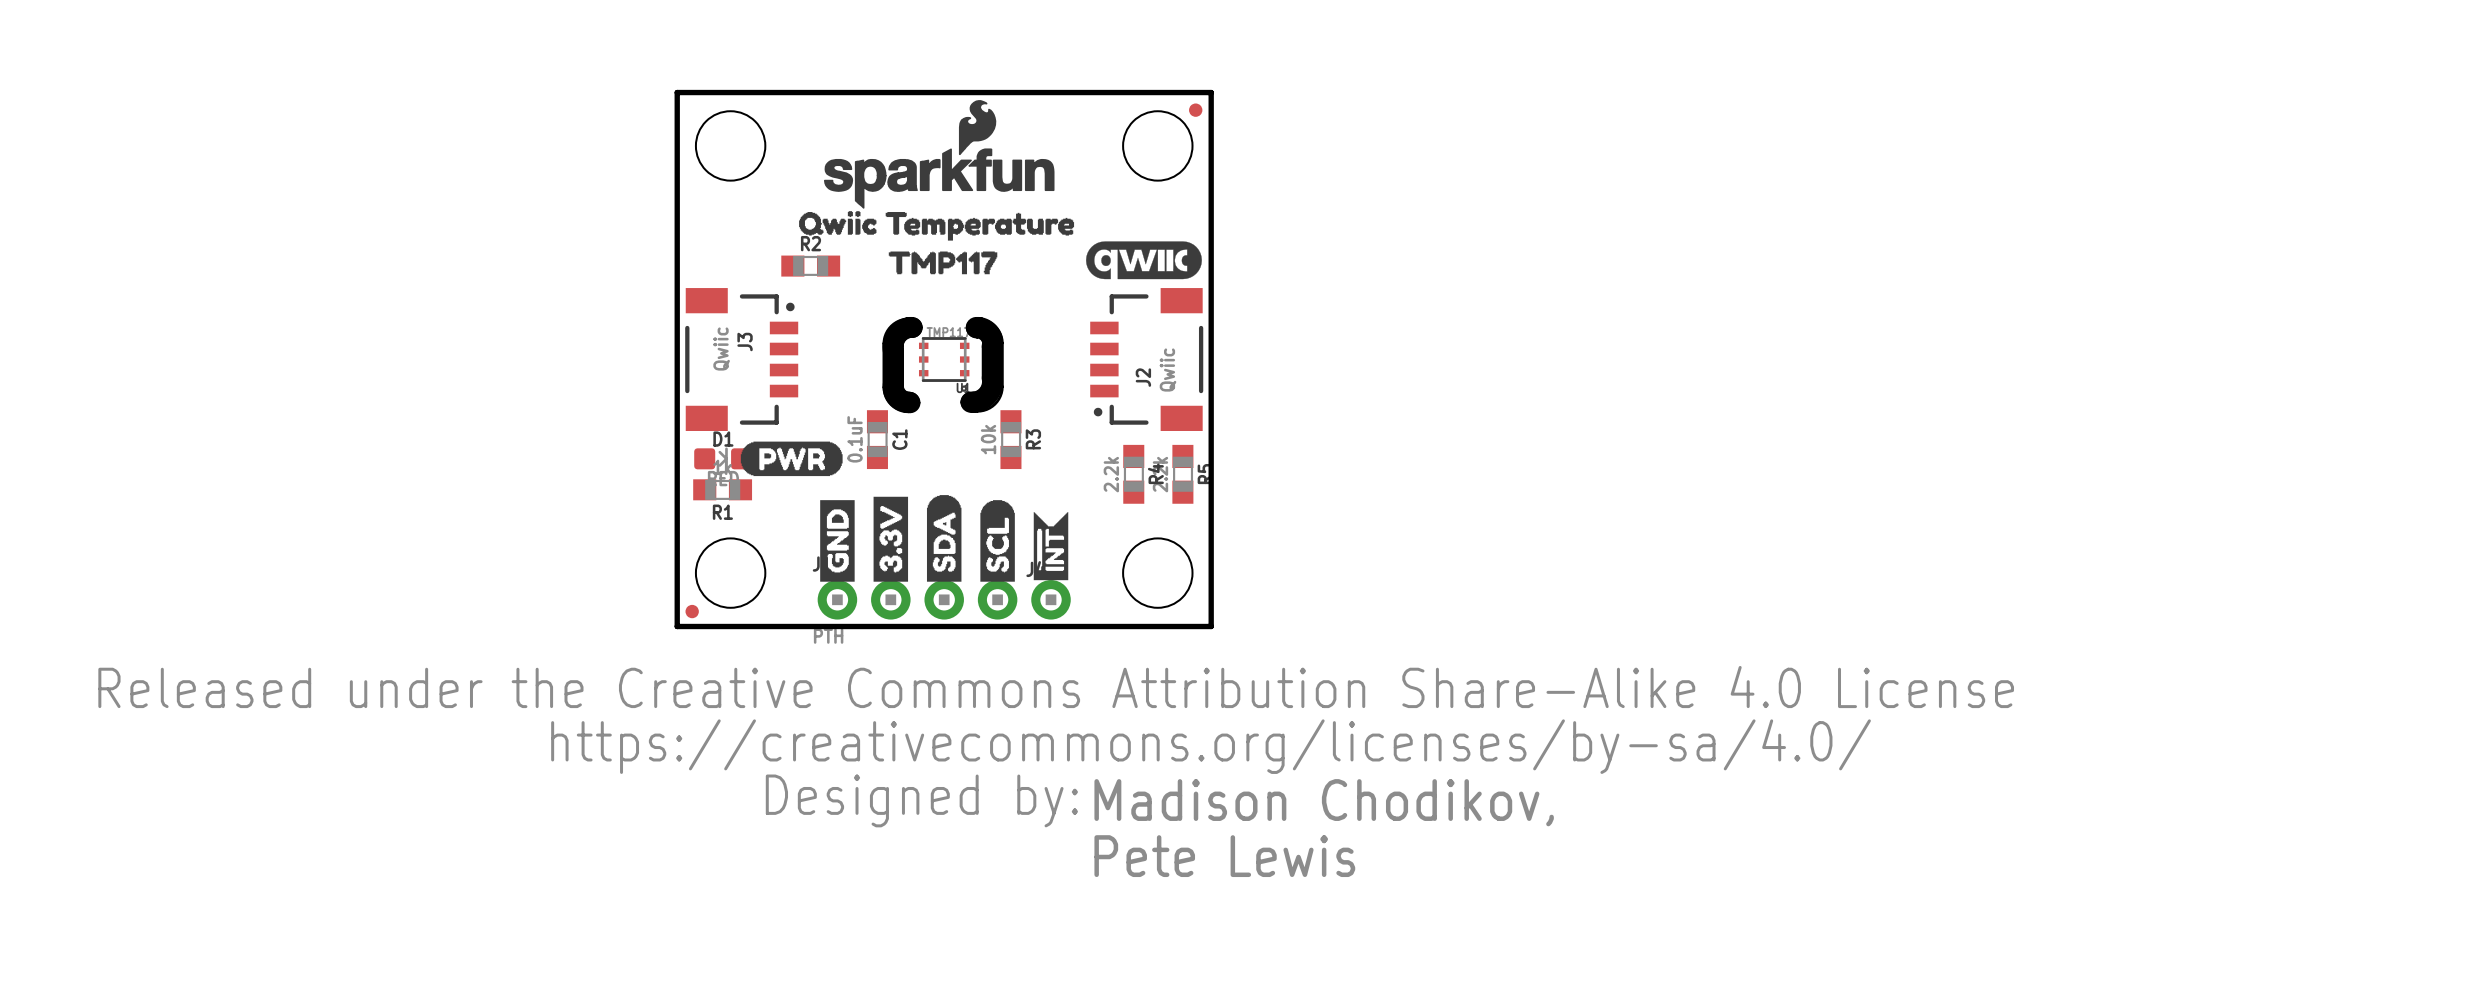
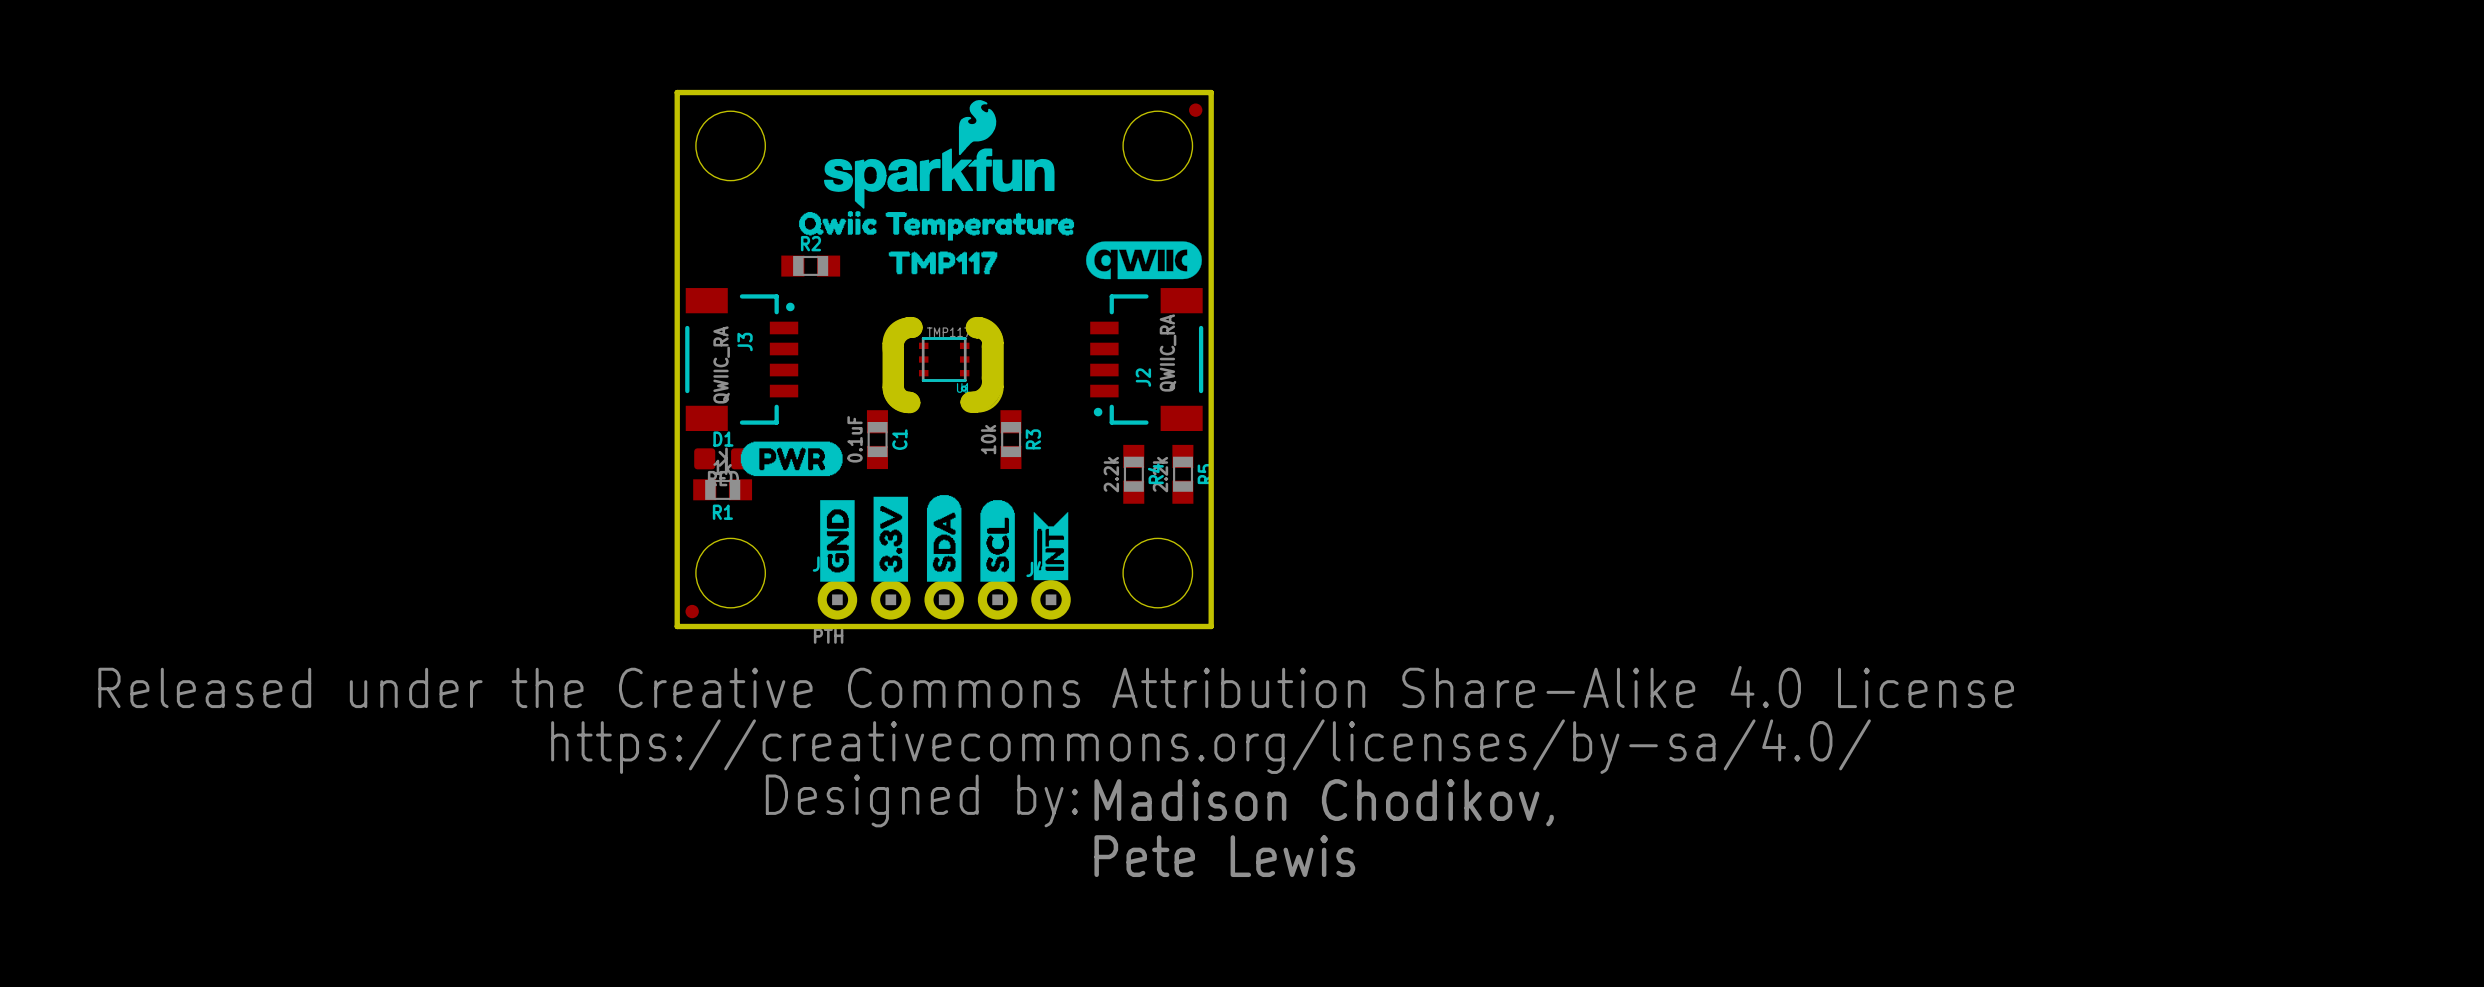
J3 value: Qwiic (721, 349) -> QWIIC_RA (721, 364)
J2 value: Qwiic (1168, 370) -> QWIIC_RA (1168, 352)

